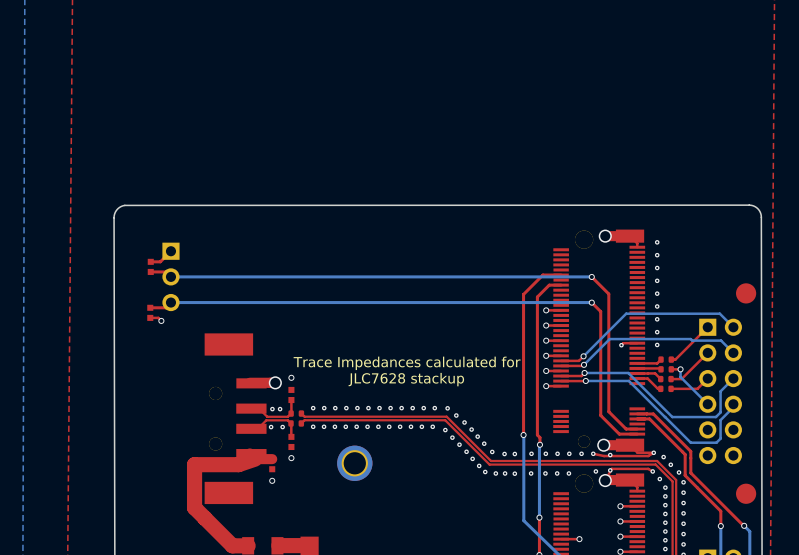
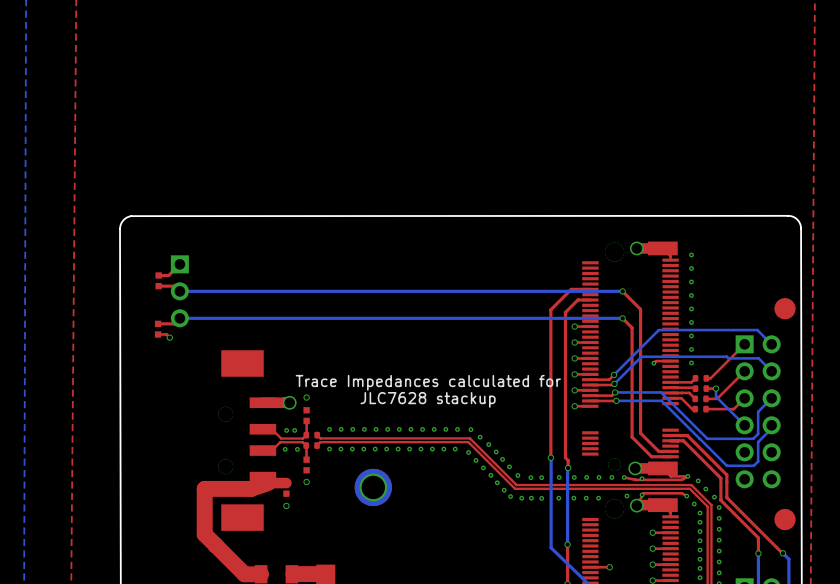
part footprint: [204, 333, 267, 505] -> [218, 350, 277, 531]

